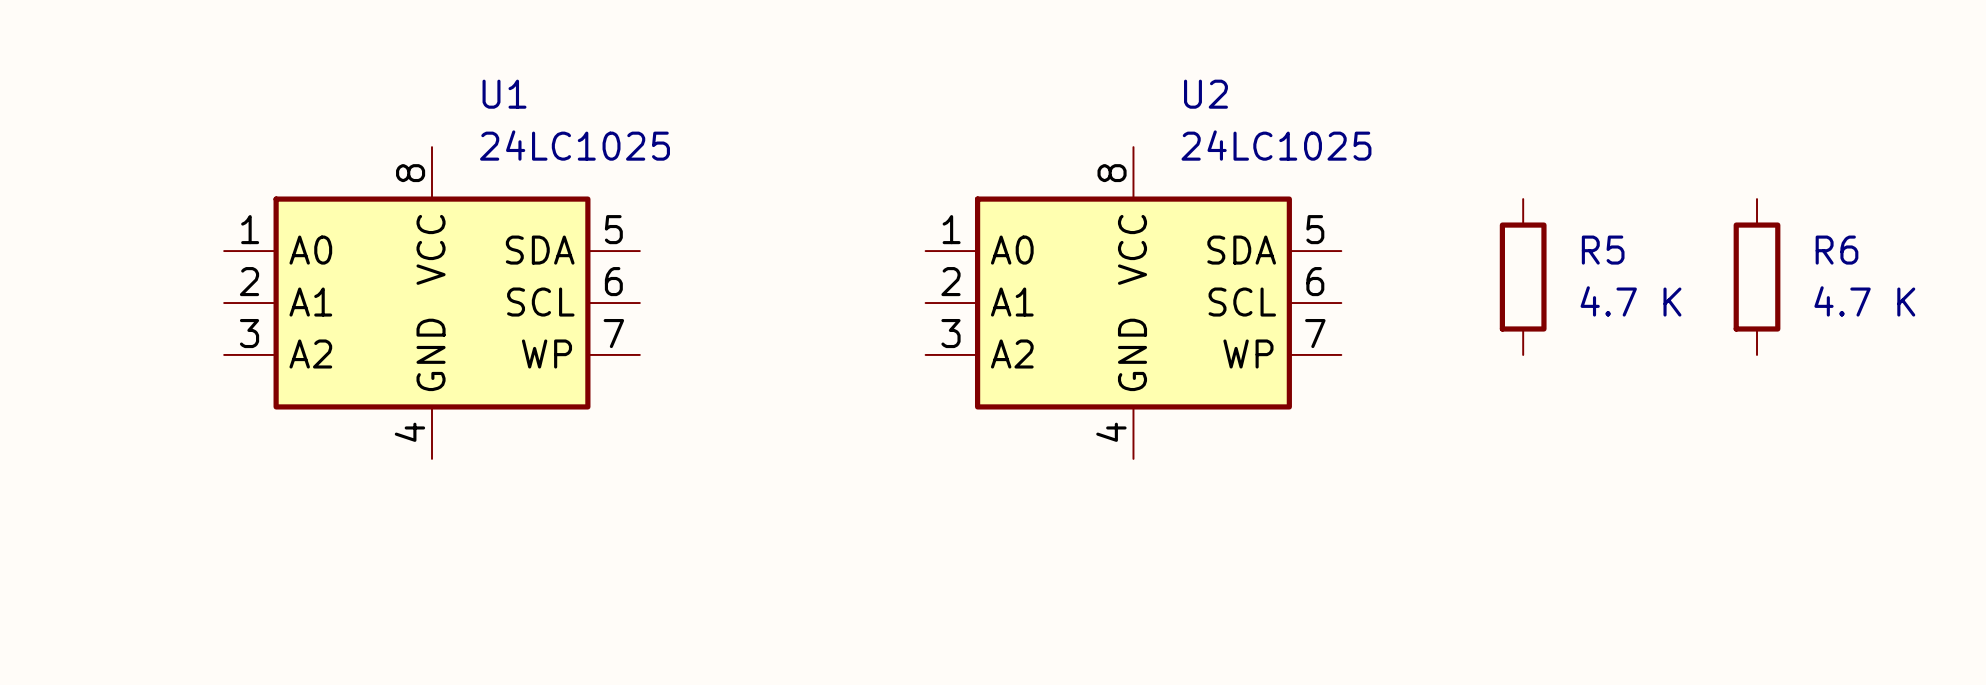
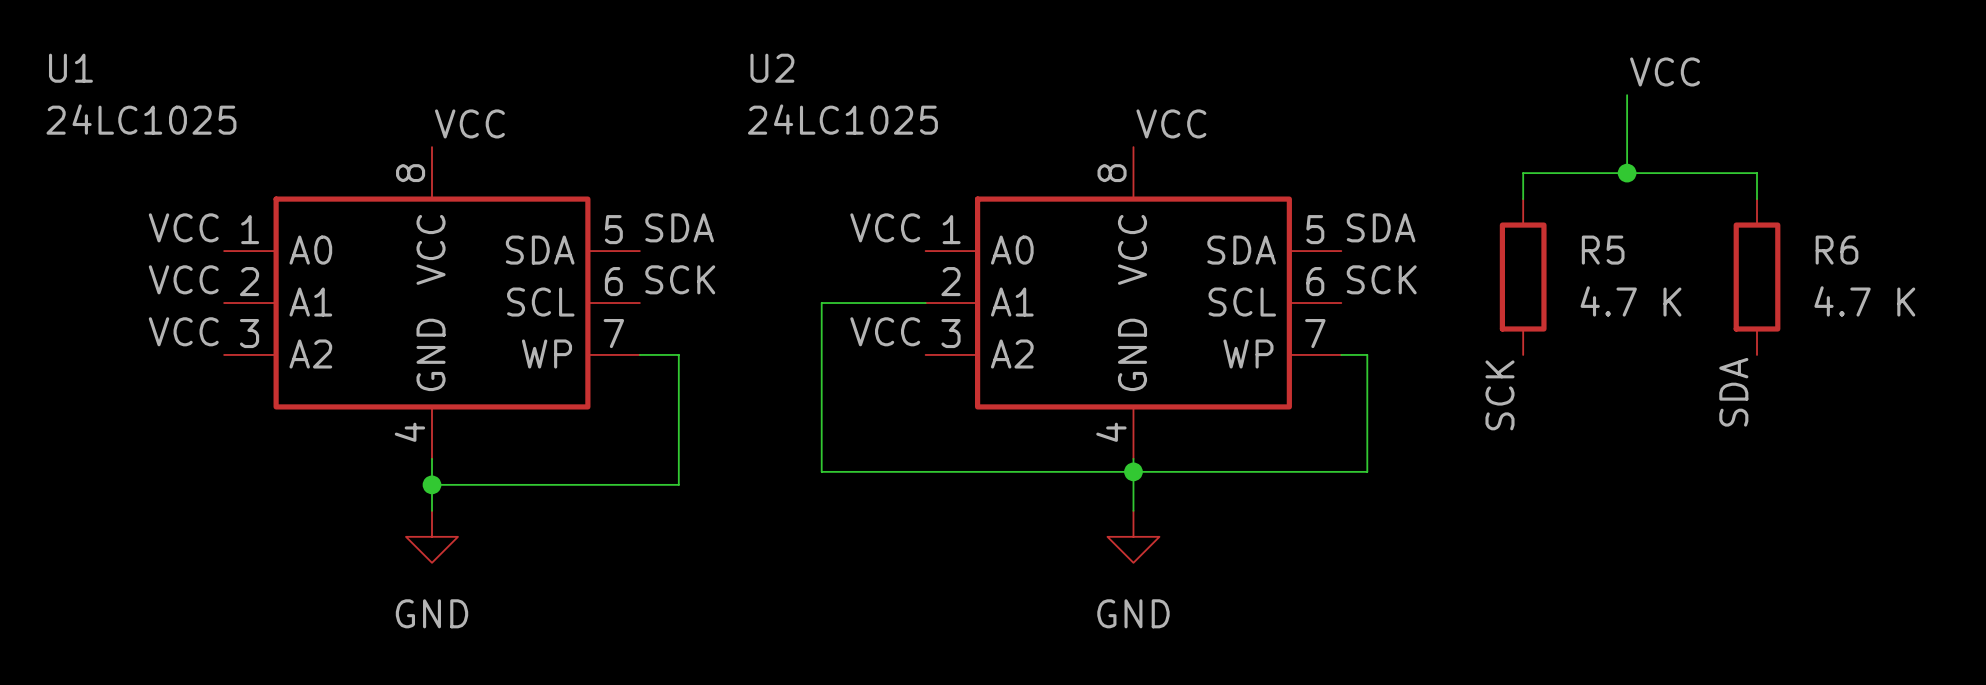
label: none -> VCC (1665, 71)
U1 name position: U1 (504, 94) -> U1 (70, 68)
U2 name position: U2 (1205, 94) -> U2 (772, 68)
wire: none -> (1627, 95) (1627, 173)
label: none -> VCC (469, 123)
label: none -> VCC (1171, 123)
U1 value position: 24LC1025 (575, 145) -> 24LC1025 (141, 119)
U2 value position: 24LC1025 (1276, 145) -> 24LC1025 (842, 119)
junction: none -> (1627, 173)
wire: none -> (1523, 199) (1523, 173) (1757, 173) (1757, 199)
label: none -> VCC (183, 227)
label: none -> SDA (679, 227)
label: none -> VCC (885, 227)
label: none -> SDA (1381, 227)
label: none -> VCC (183, 279)
label: none -> SCK (680, 279)
label: none -> SCK (1381, 279)
wire: none -> (925, 303) (821, 303) (821, 471) (1367, 471) (1367, 354) (1341, 354)
label: none -> VCC (183, 331)
label: none -> VCC (885, 331)
wire: none -> (639, 354) (678, 354) (678, 484) (432, 484)
label: none -> SDA (1733, 392)
label: none -> SCK (1499, 395)
wire: none -> (432, 458) (432, 510)
wire: none -> (1133, 458) (1133, 510)
junction: none -> (1133, 471)
junction: none -> (432, 484)
power symbol: none -> GND (432, 536)
power symbol: none -> GND (1133, 536)

